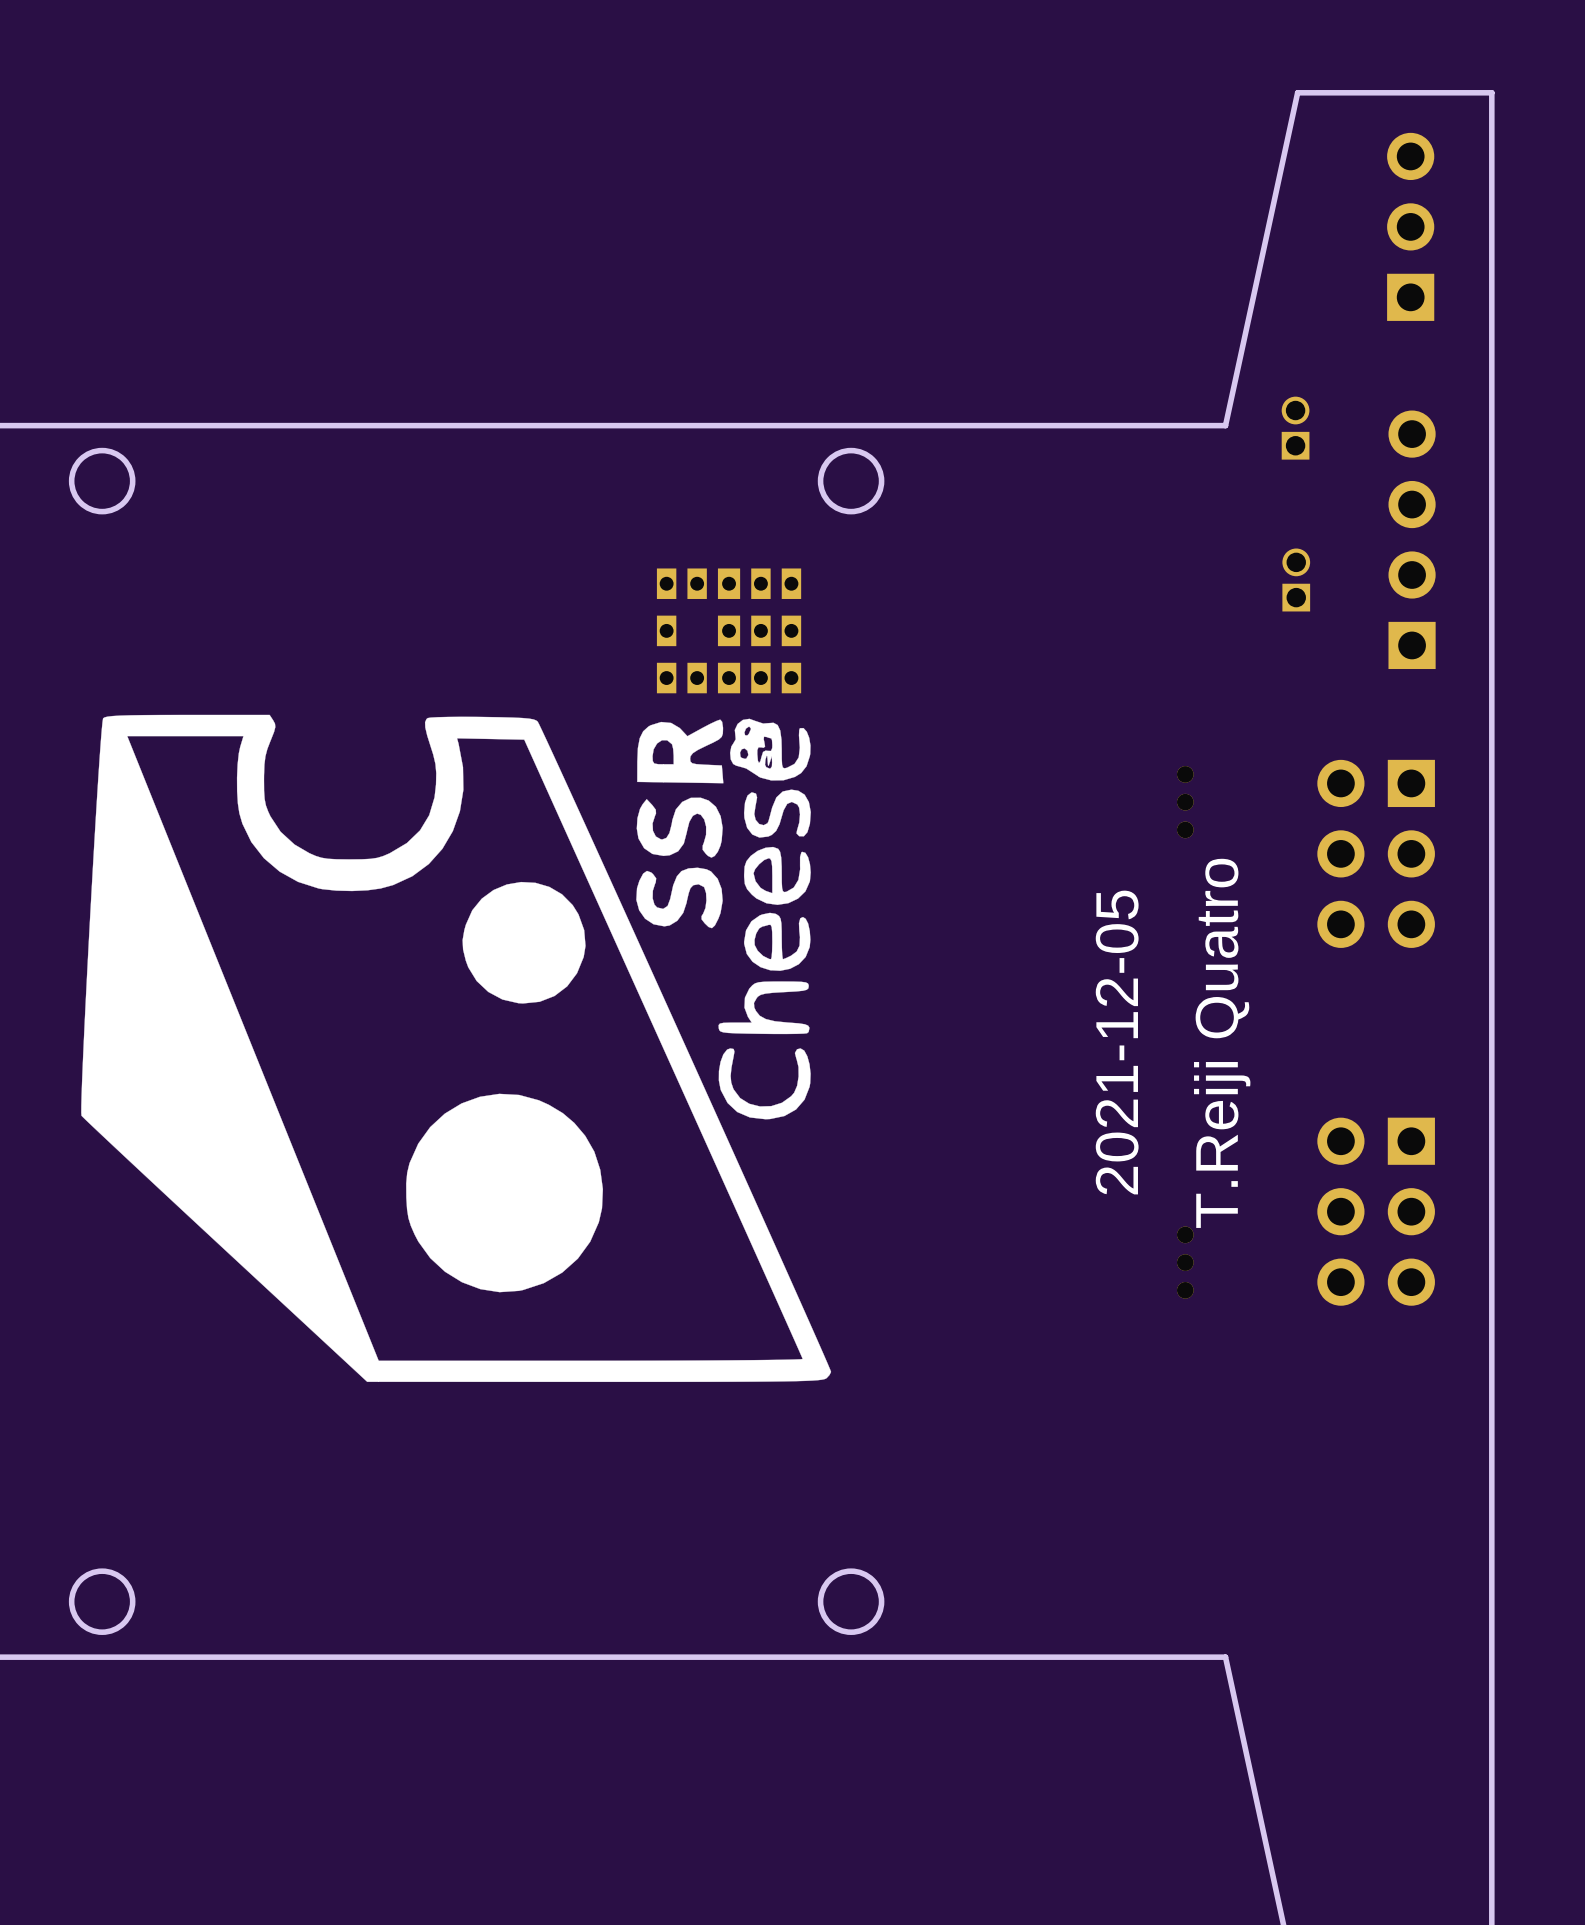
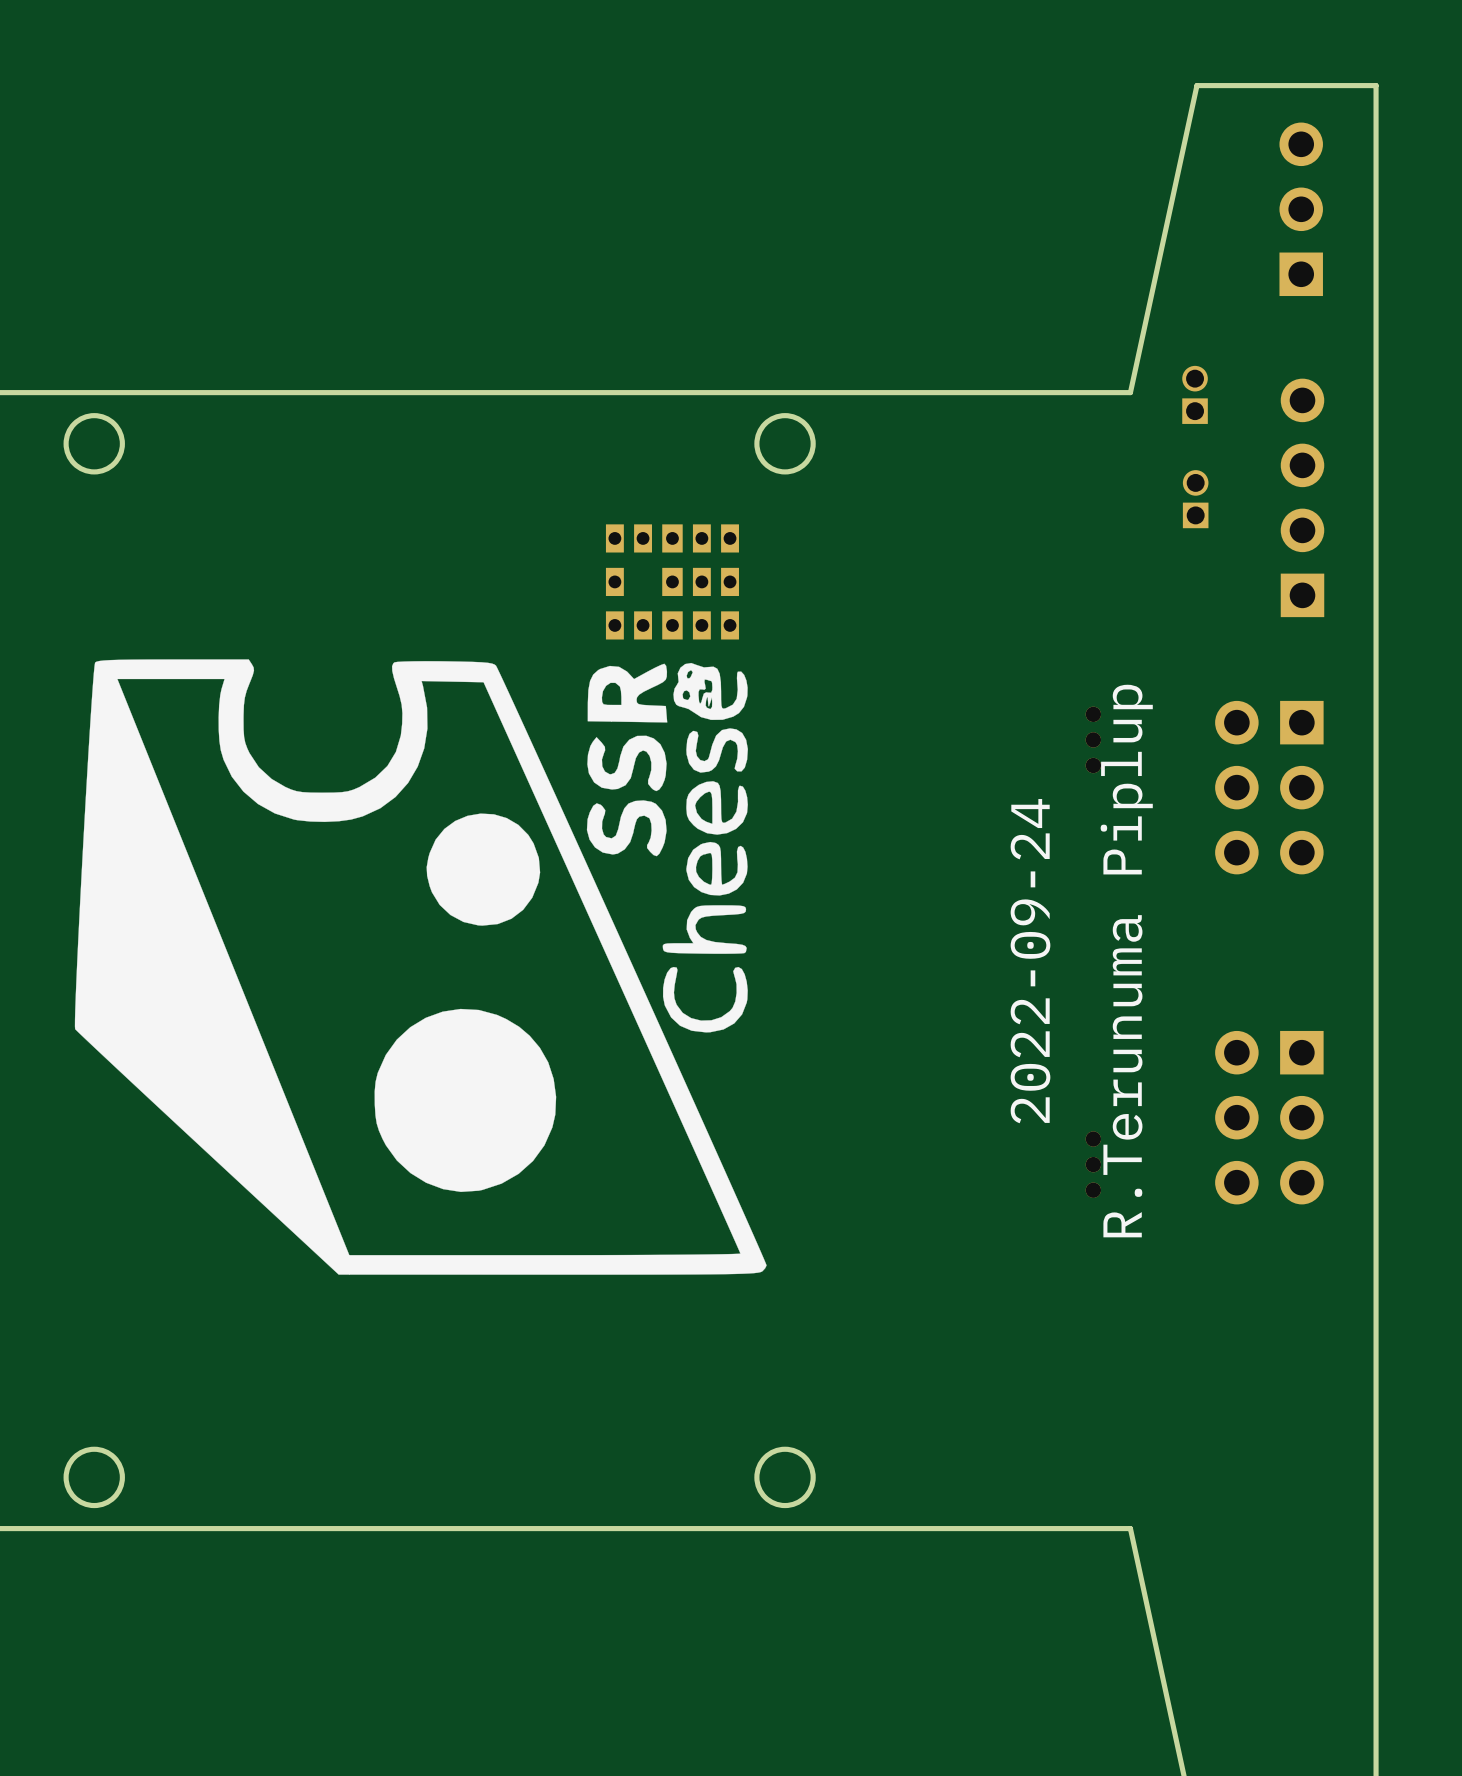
part position: (1296, 579) -> (1195, 499)
text: 2021-12-05 (1117, 1042) -> 2022-09-24 (1030, 961)
text: T.Reiji Quatro (1222, 1043) -> R.Terunuma Piplup (1126, 961)

